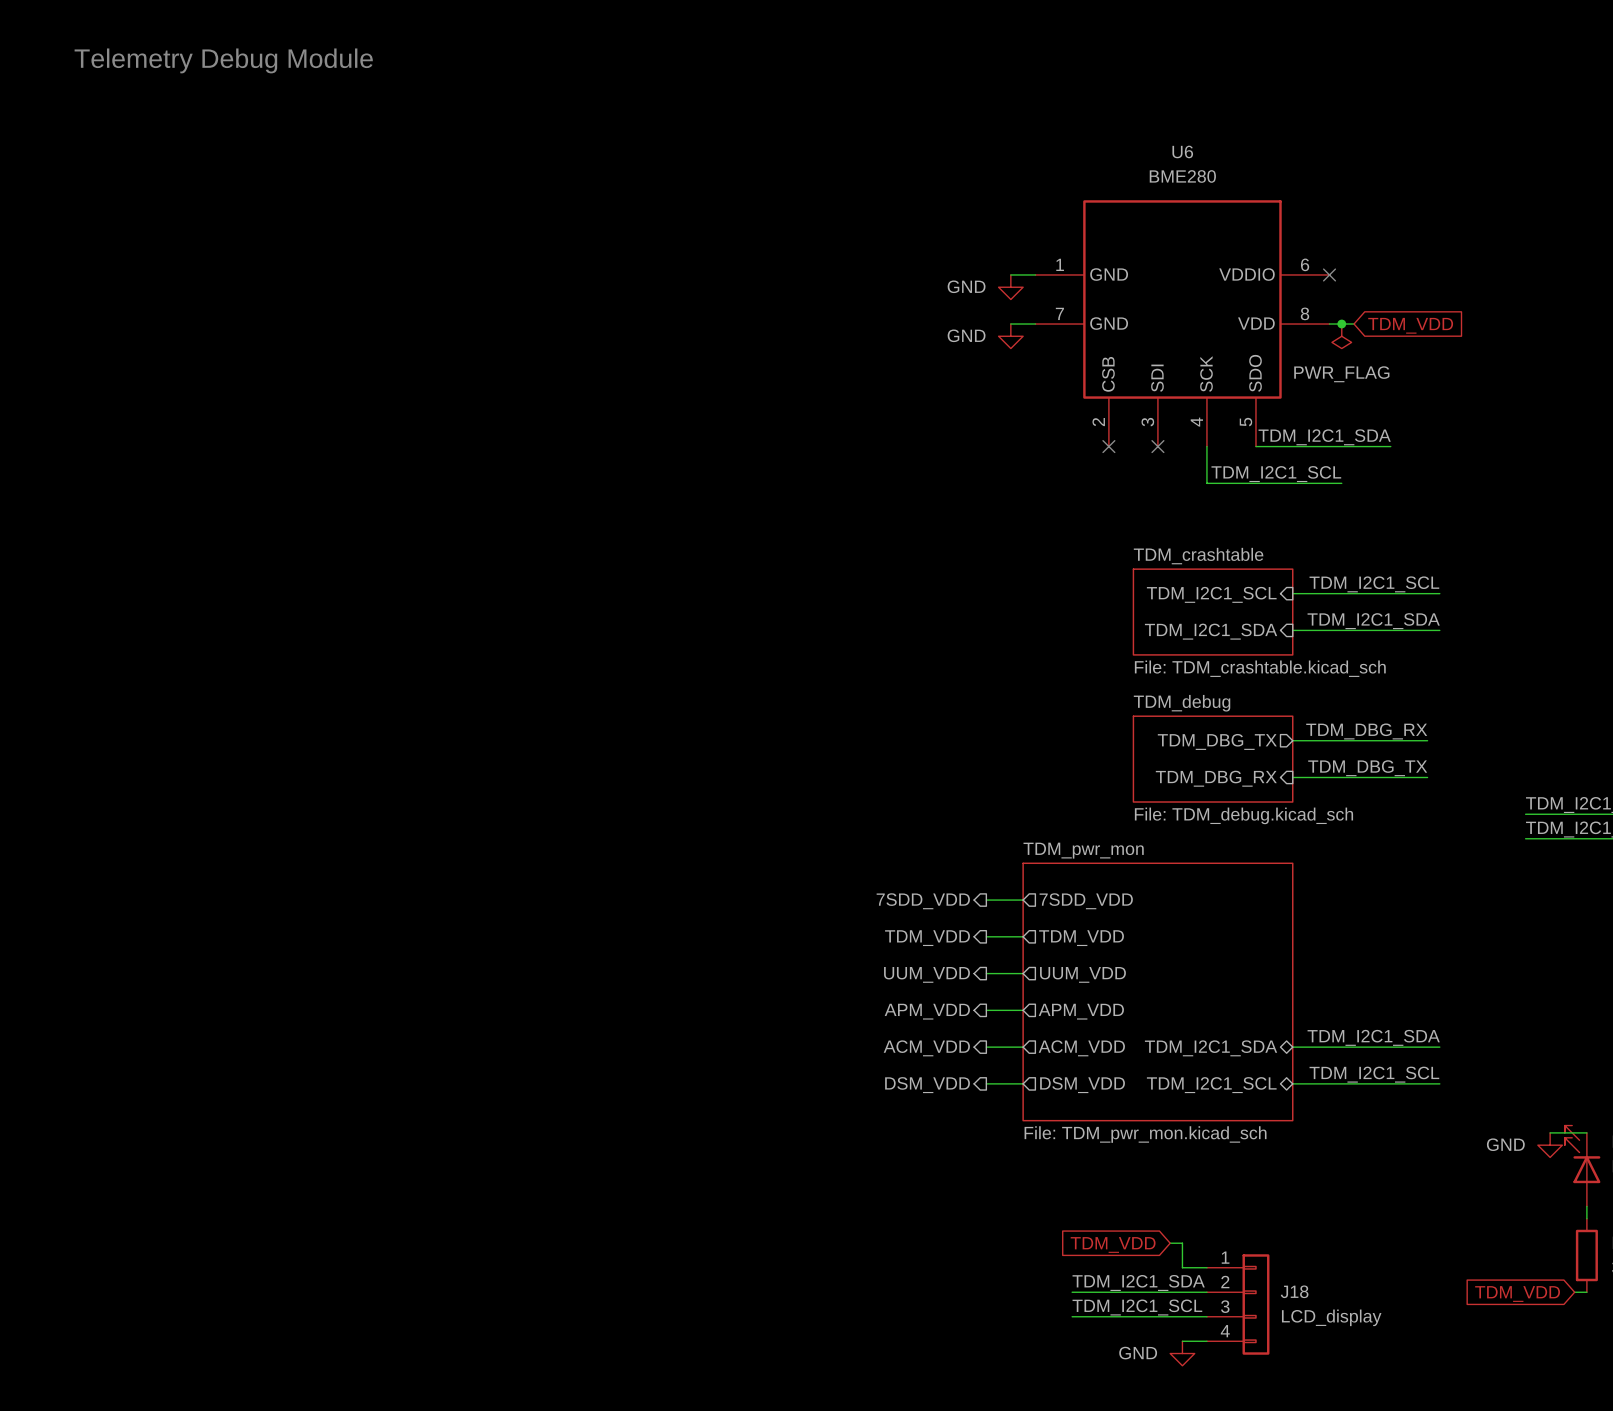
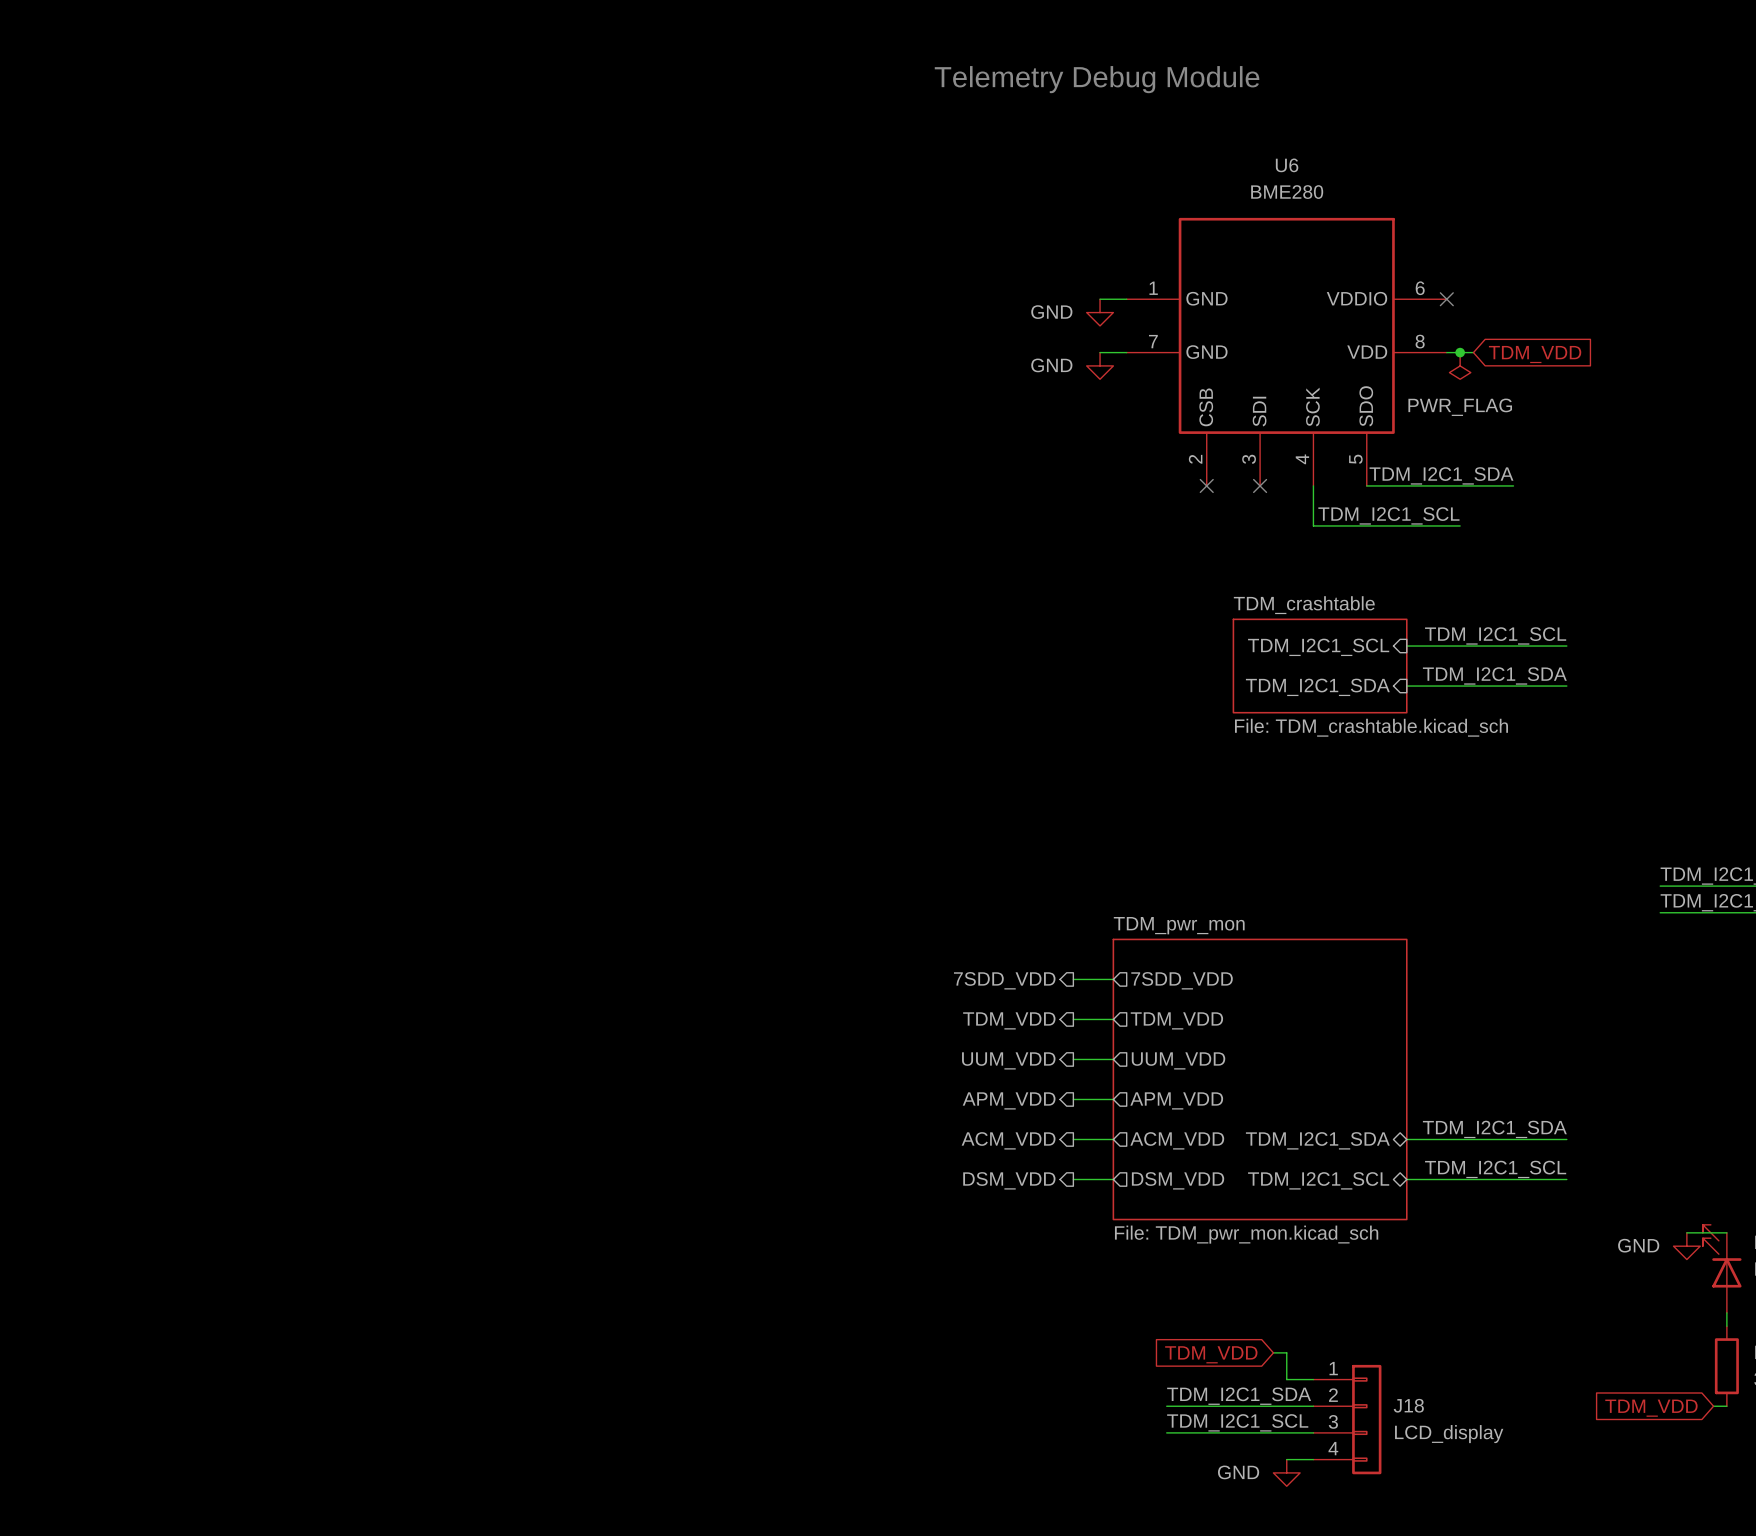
text: Telemetry Debug Module (223, 60) -> none
text: none -> Telemetry Debug Module (1097, 79)
label: TDM_DBG_RX (1366, 731) -> none
wire: (1292, 740) (1427, 740) -> none
sheet pin: TDM_DBG_TX (1217, 741) -> none
sheet TDM_debug: File: TDM_debug.kicad_sch (1213, 759) -> none
label: TDM_DBG_TX (1367, 768) -> none
wire: (1292, 777) (1427, 777) -> none
sheet pin: TDM_DBG_RX (1216, 778) -> none

